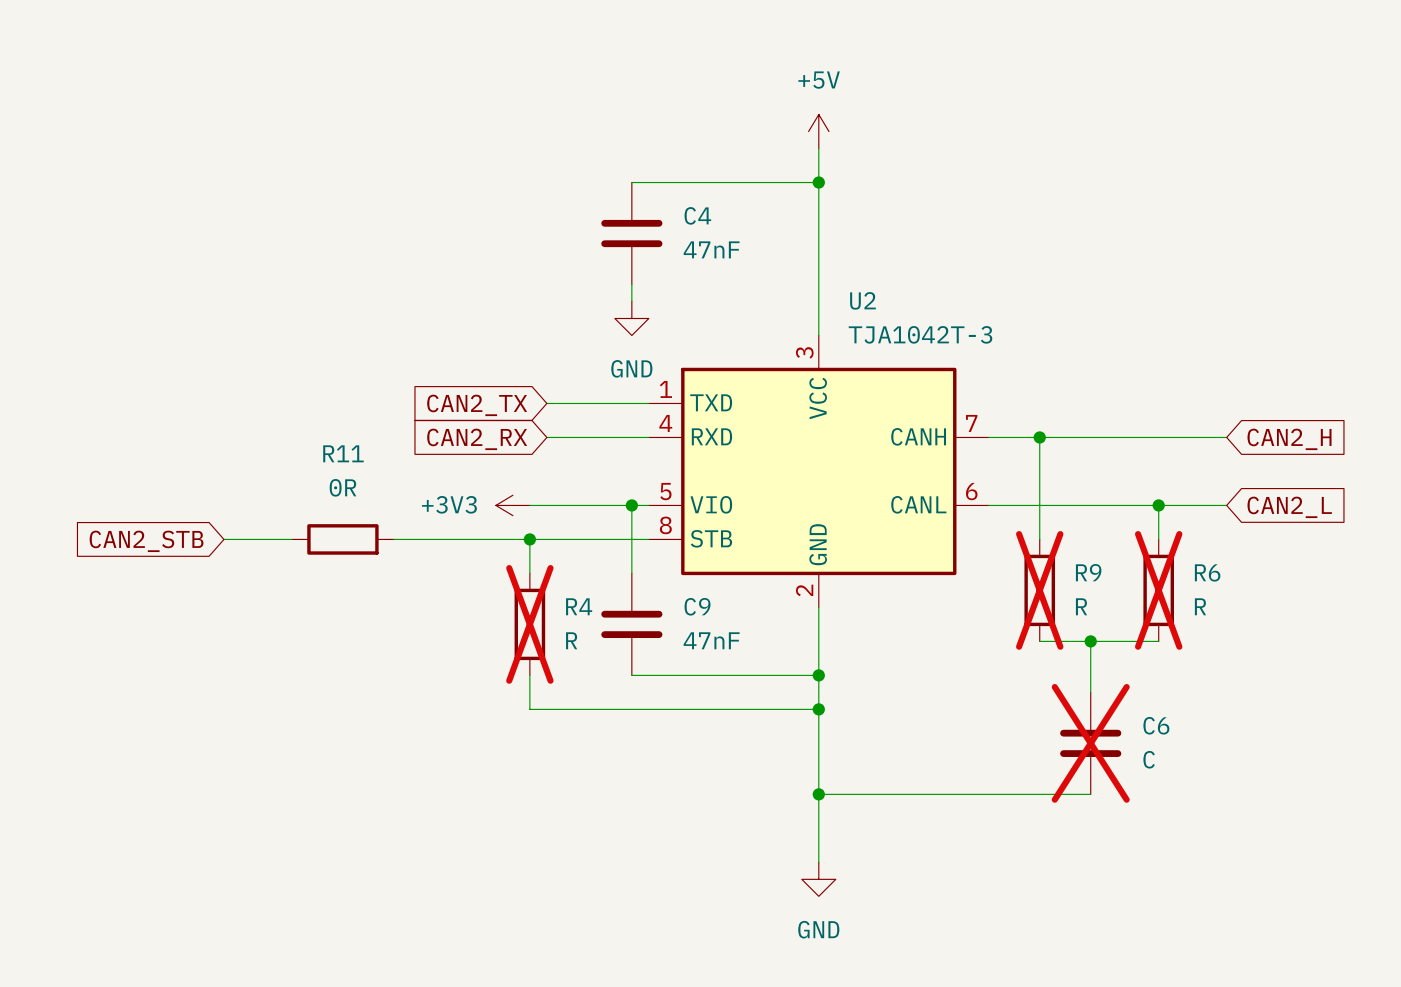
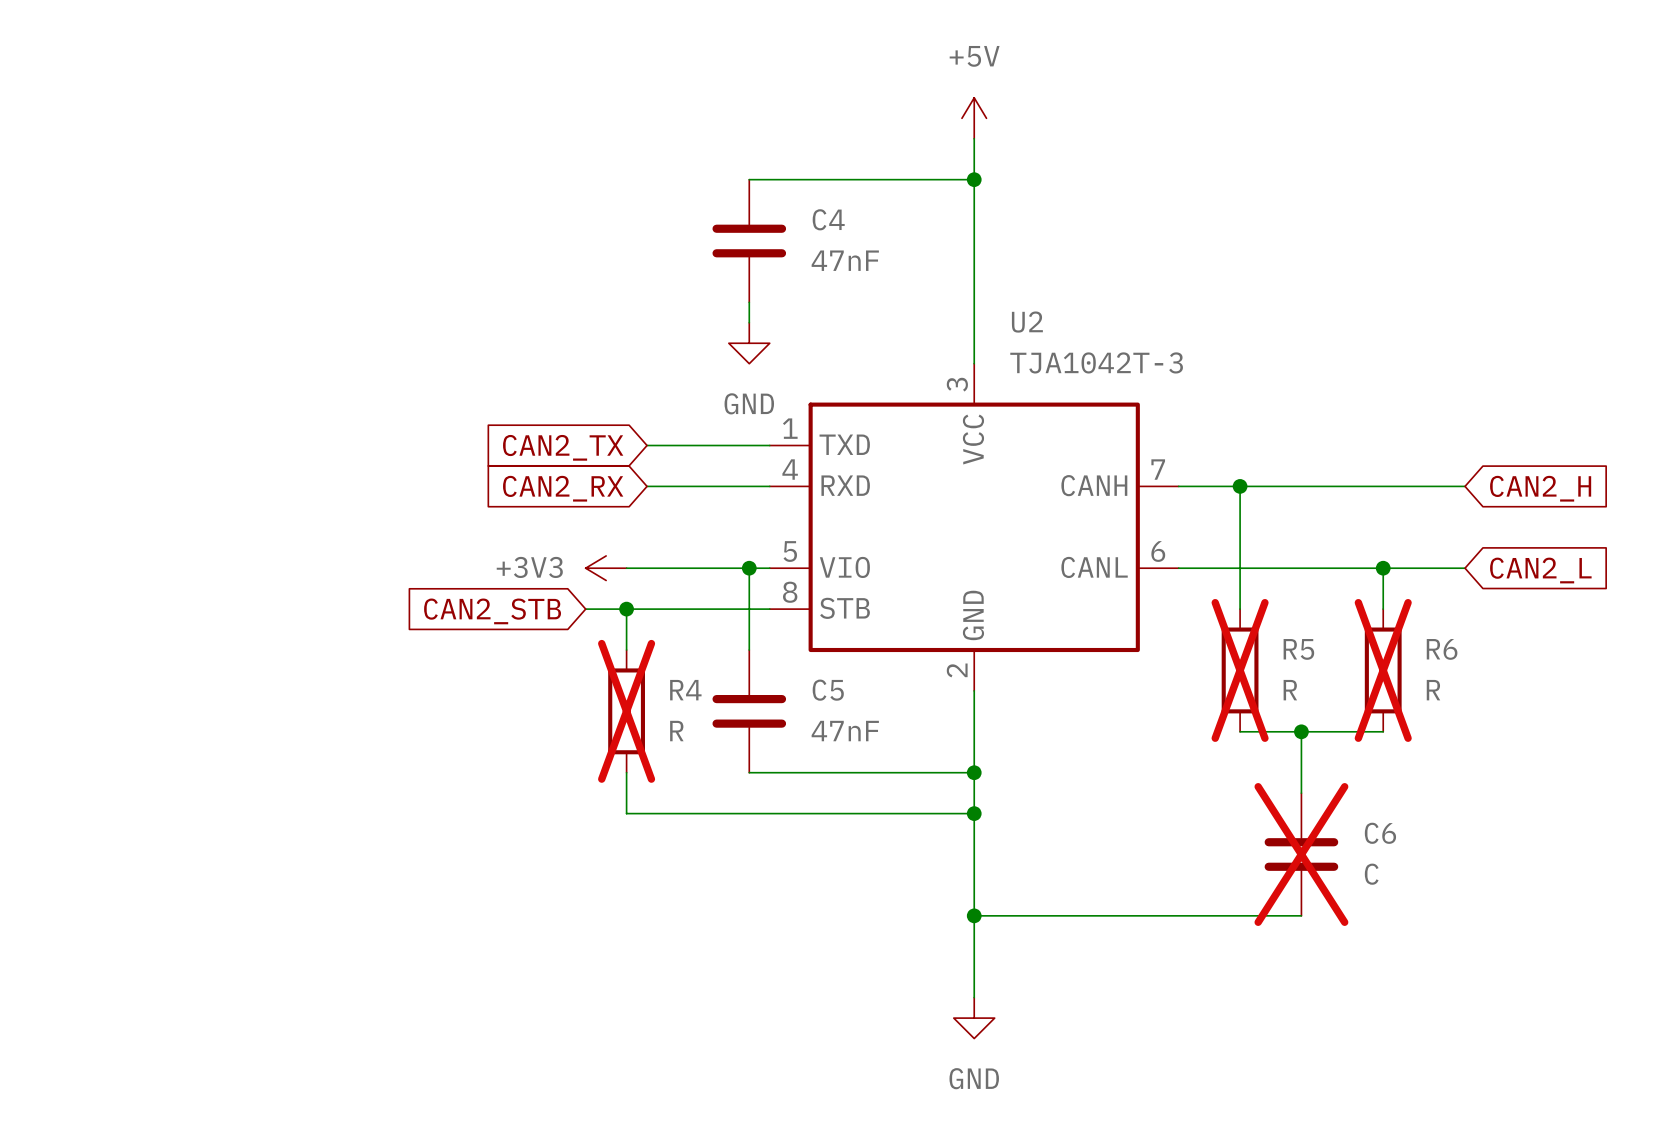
wire: (223, 539) (291, 539) -> none
R11: 0R (342, 539) -> none
wire: (393, 539) (495, 539) -> none
global label position: CAN2_STB (146, 541) -> CAN2_STB (492, 611)
R9 name: R9 (1088, 572) -> R5 (1298, 649)
C9 name: C9 (697, 606) -> C5 (828, 690)

